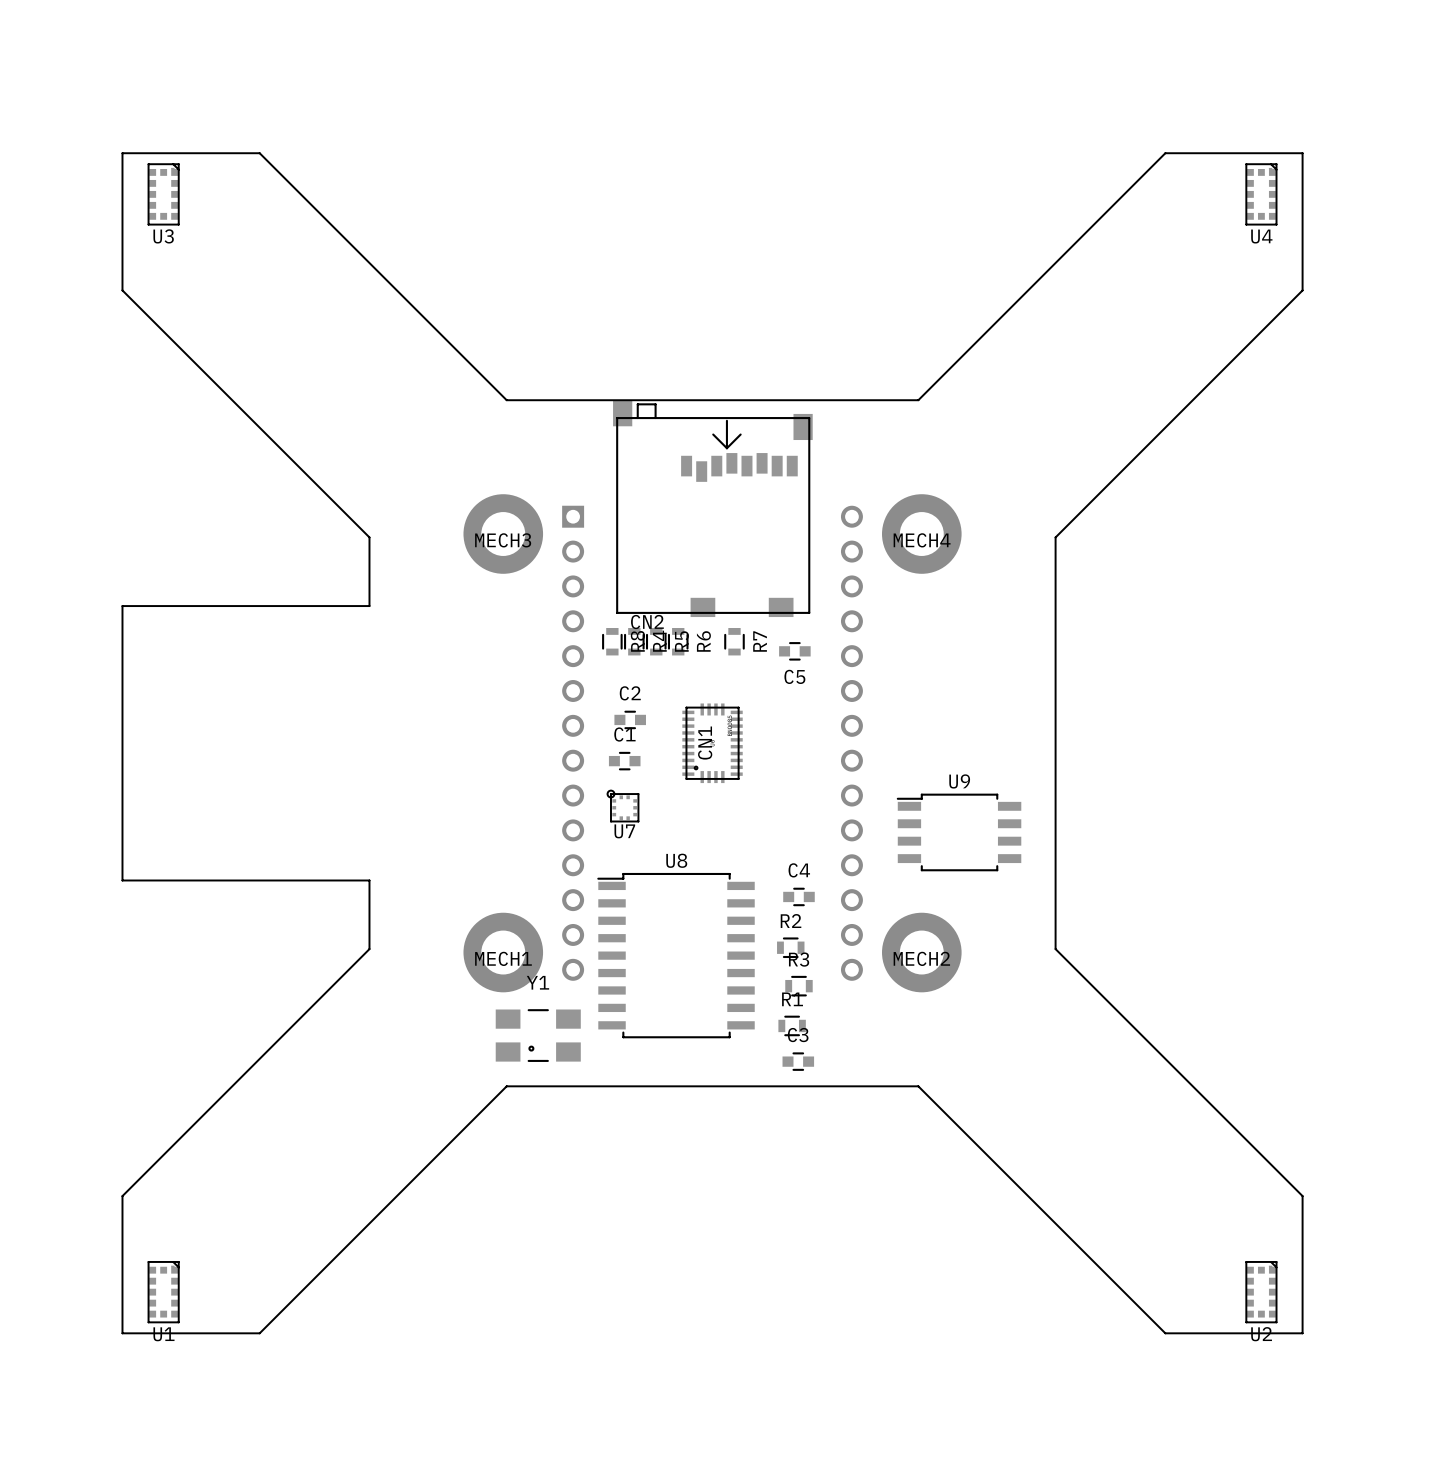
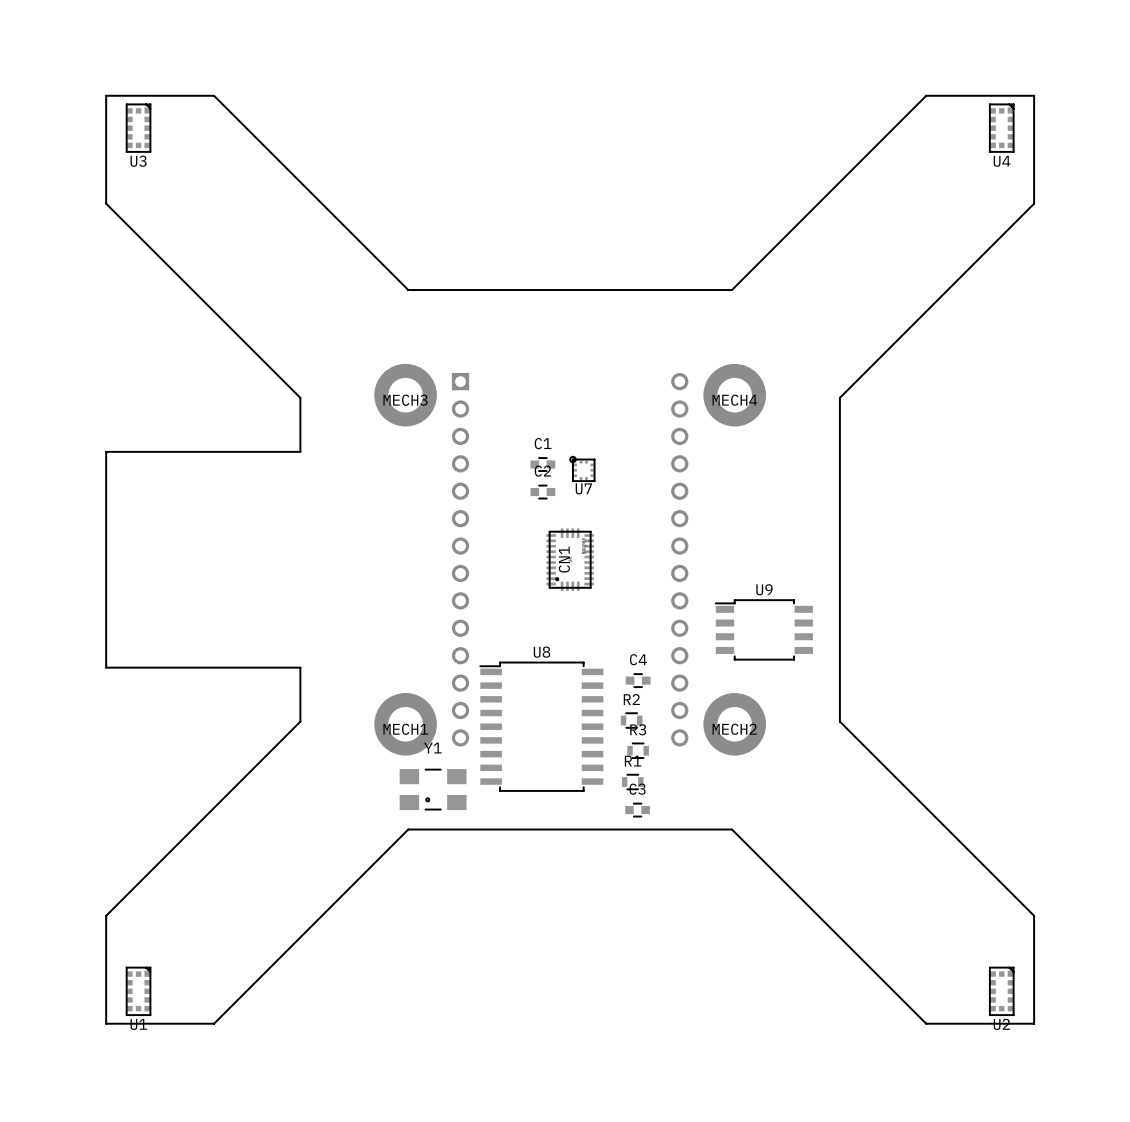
CN2: (712, 508) -> none
R8: (612, 641) -> none
R4: (634, 641) -> none
R5: (656, 641) -> none
R6: (678, 641) -> none
R7: (734, 641) -> none
C5: (794, 651) -> none
C2 position: (630, 719) -> (542, 492)
C1 position: (624, 761) -> (542, 464)
U7 position: (623, 806) -> (582, 468)

